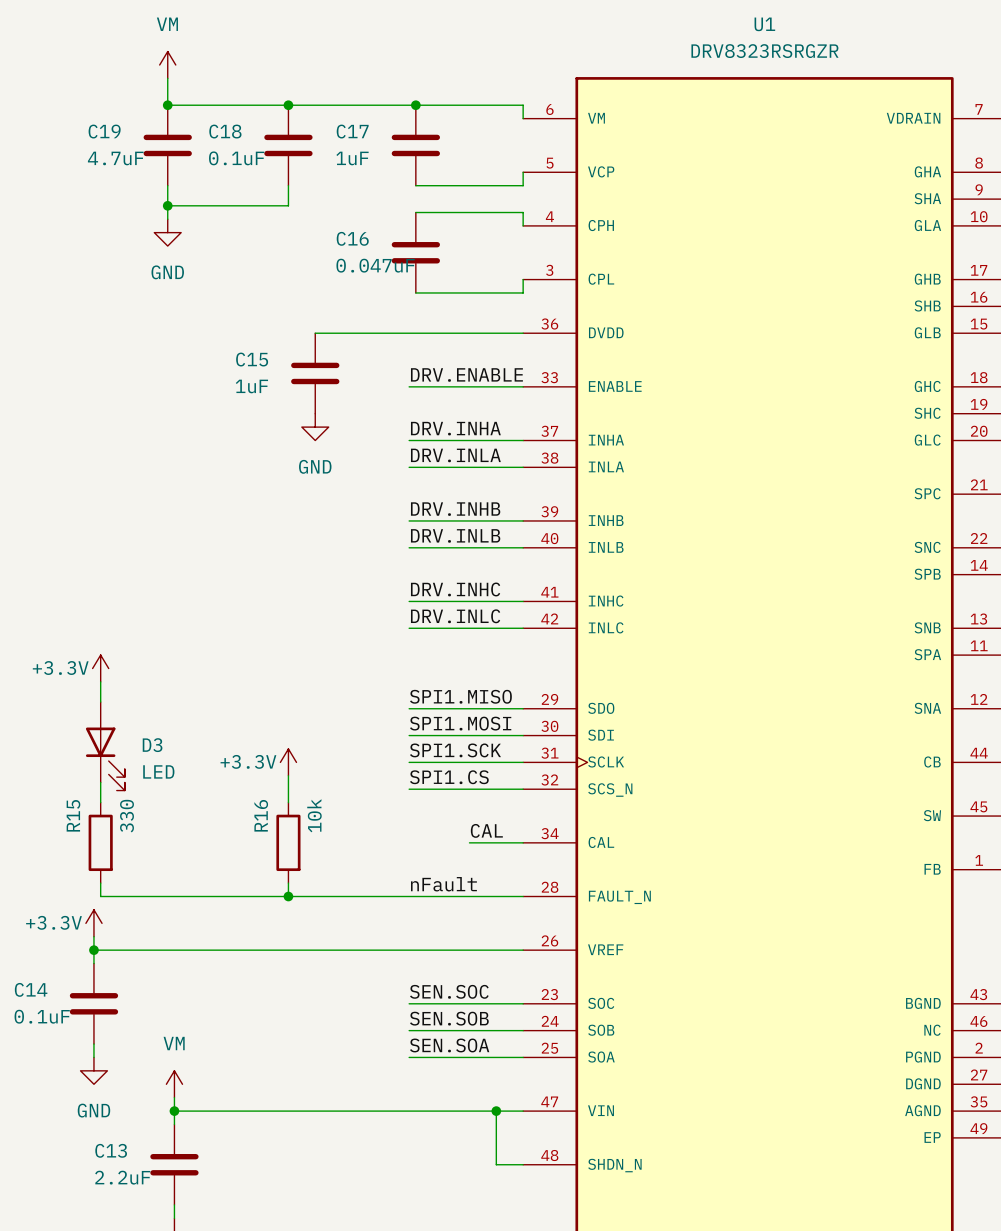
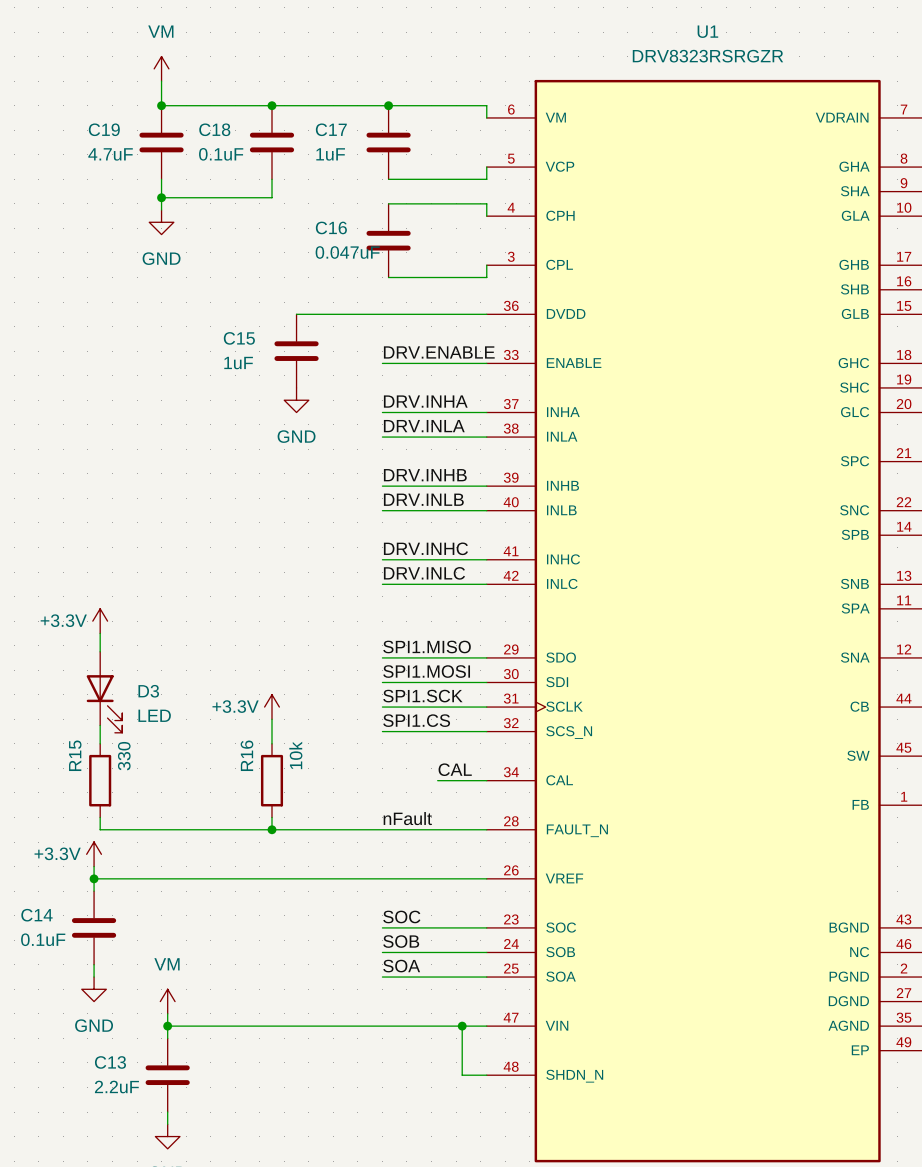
label: SEN.SOC (449, 991) -> SOC (401, 916)
label: SEN.SOB (449, 1018) -> SOB (401, 941)
label: SEN.SOA (449, 1045) -> SOA (401, 966)

